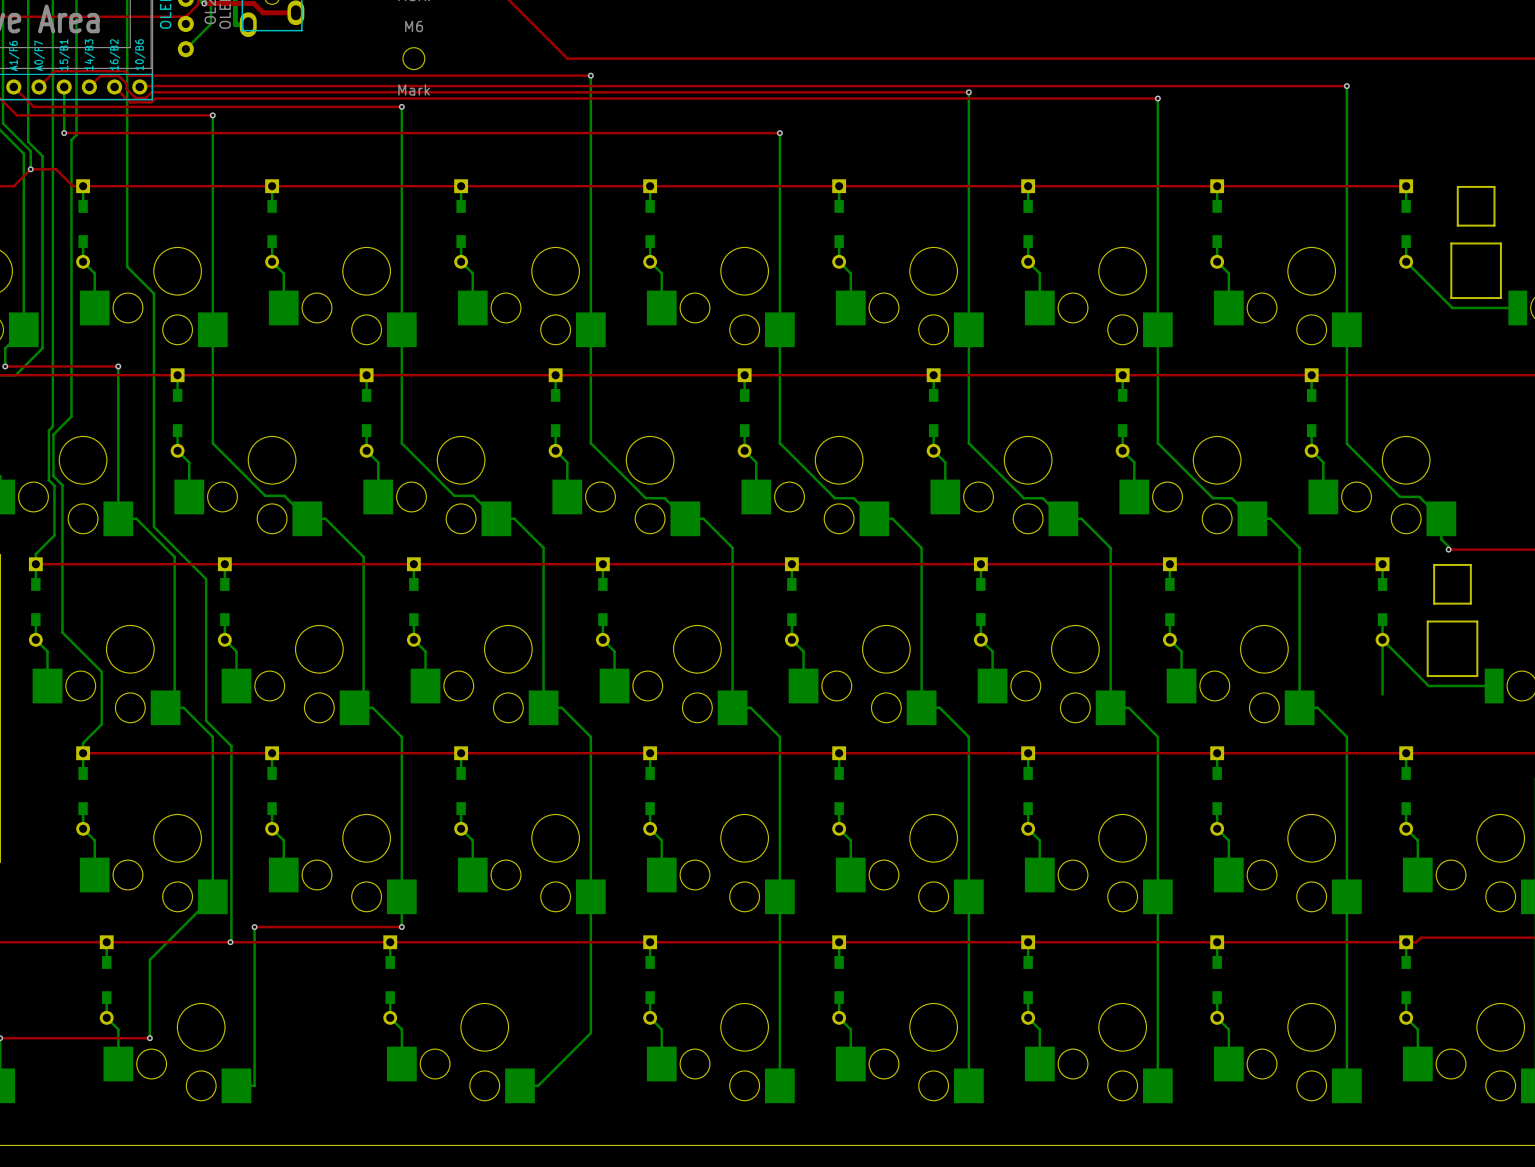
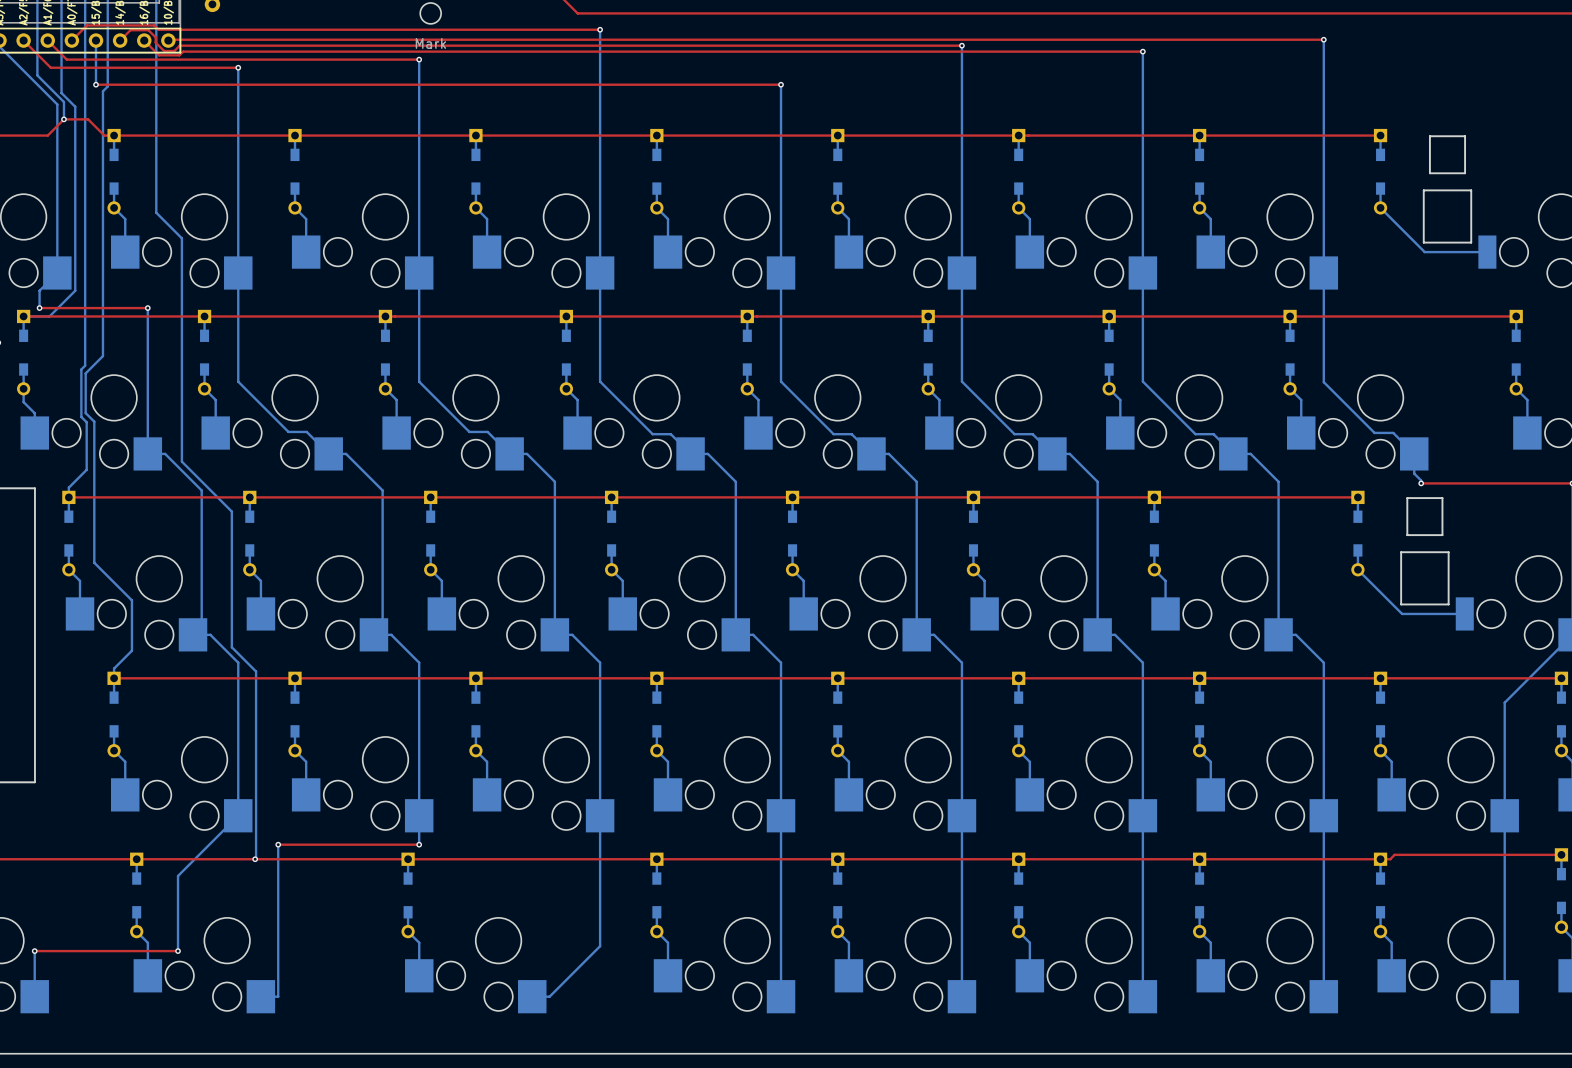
bottom track: (1382, 639) (1382, 694) -> none

